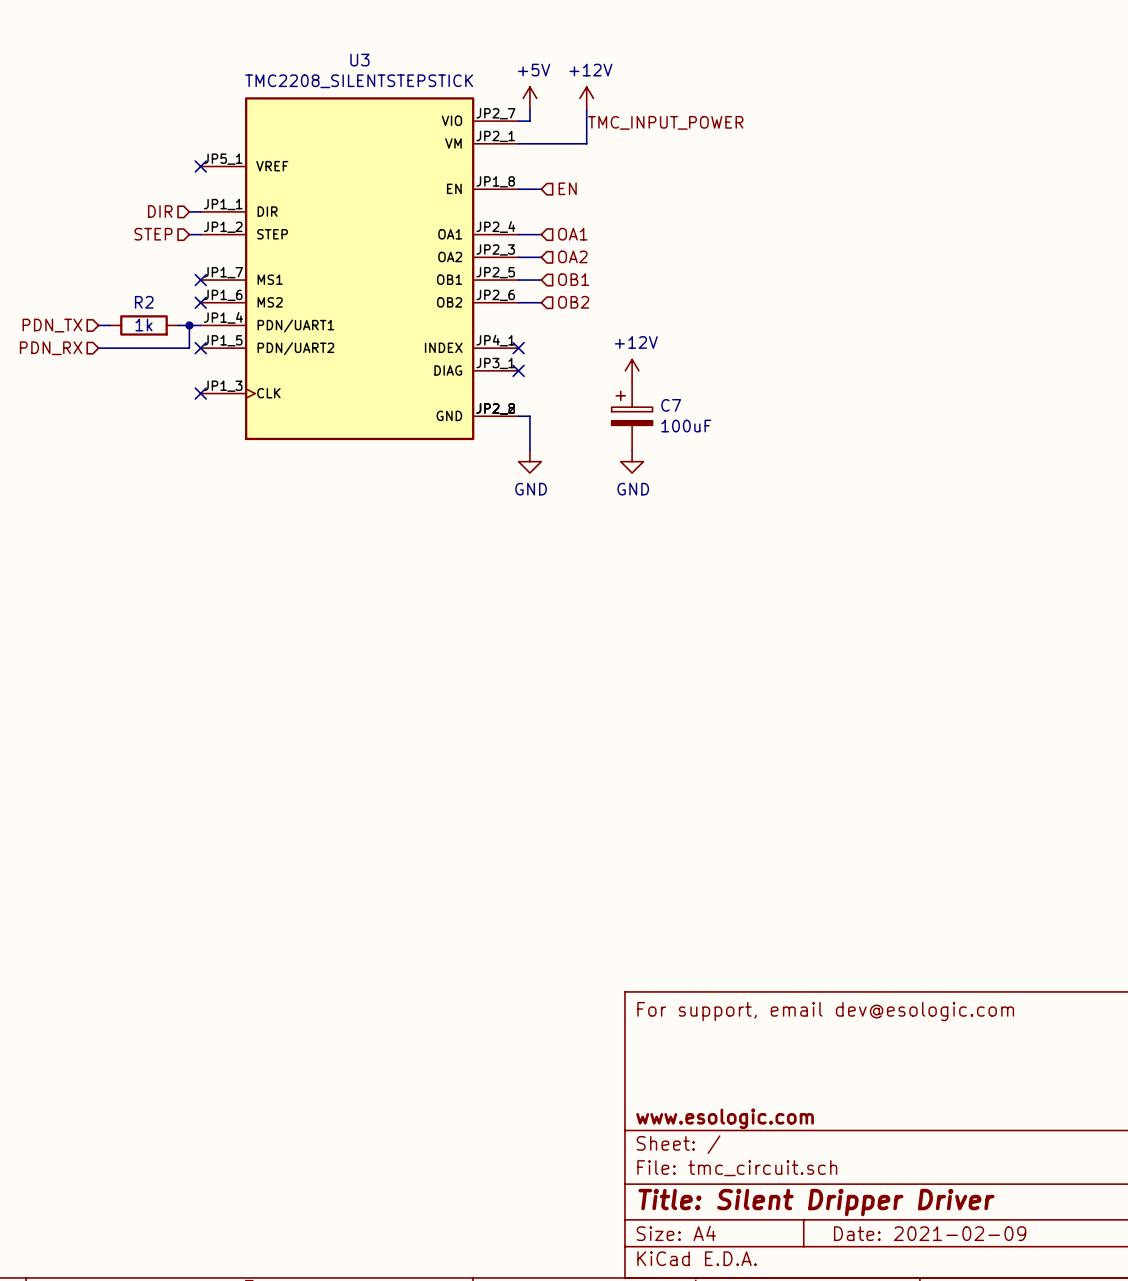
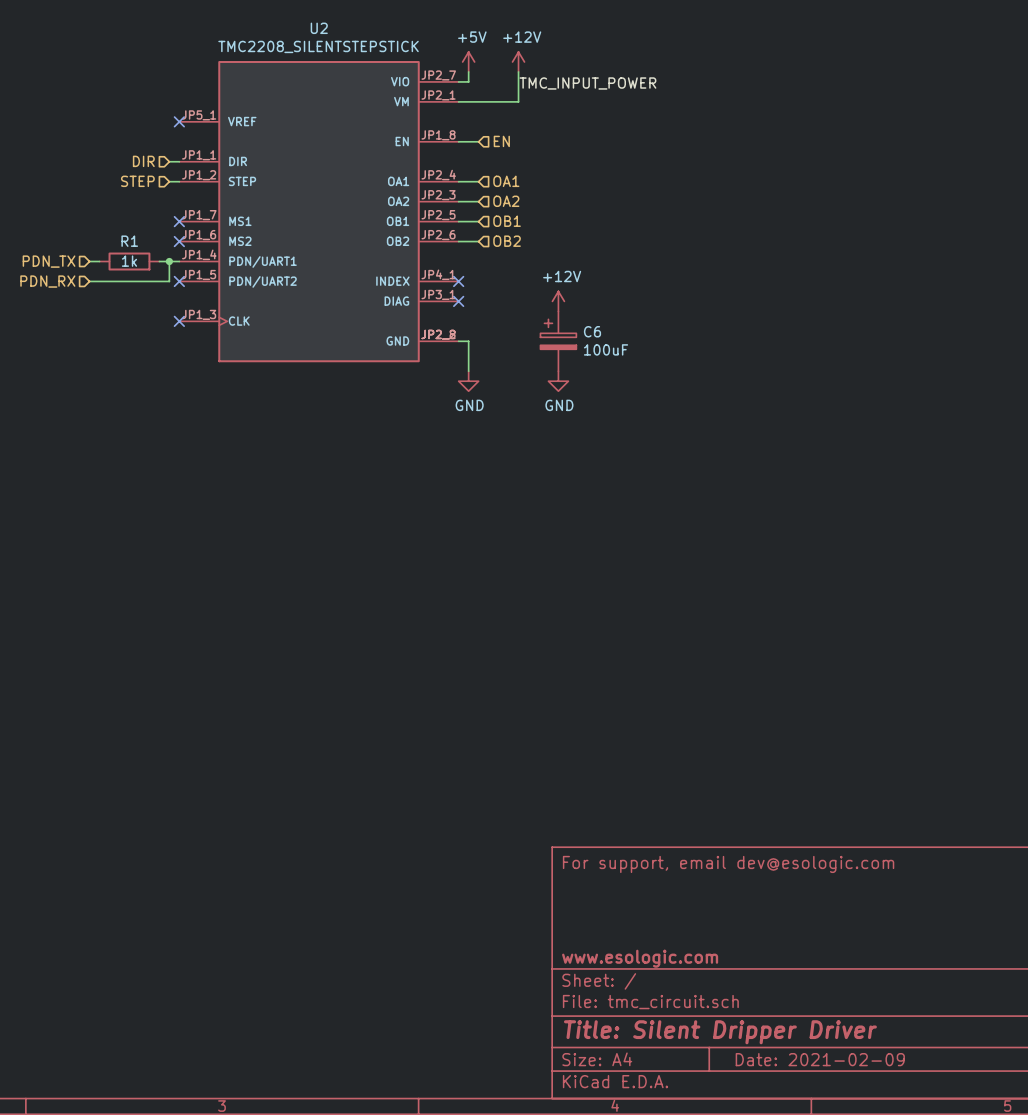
U3 name: U3 (359, 60) -> U2 (319, 28)
R2 name: R2 (144, 302) -> R1 (129, 241)
C7 name: C7 (671, 405) -> C6 (592, 331)

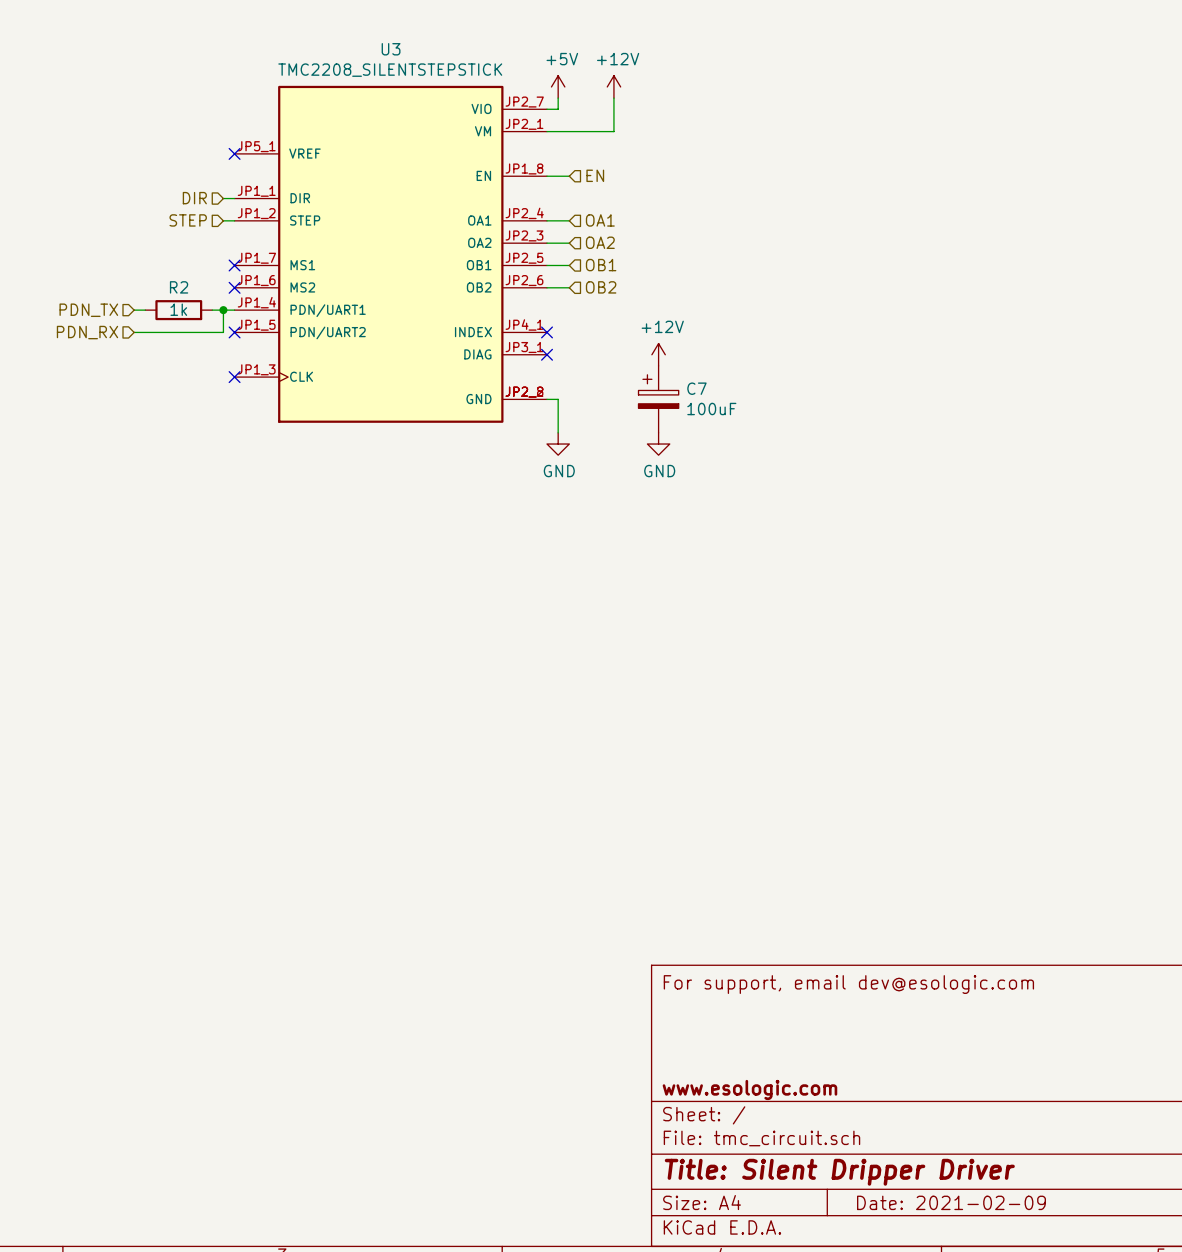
U2 name: U2 (319, 28) -> U3 (391, 49)
label: TMC_INPUT_POWER (587, 83) -> none
R1 name: R1 (129, 241) -> R2 (179, 287)
C6 name: C6 (592, 331) -> C7 (696, 388)

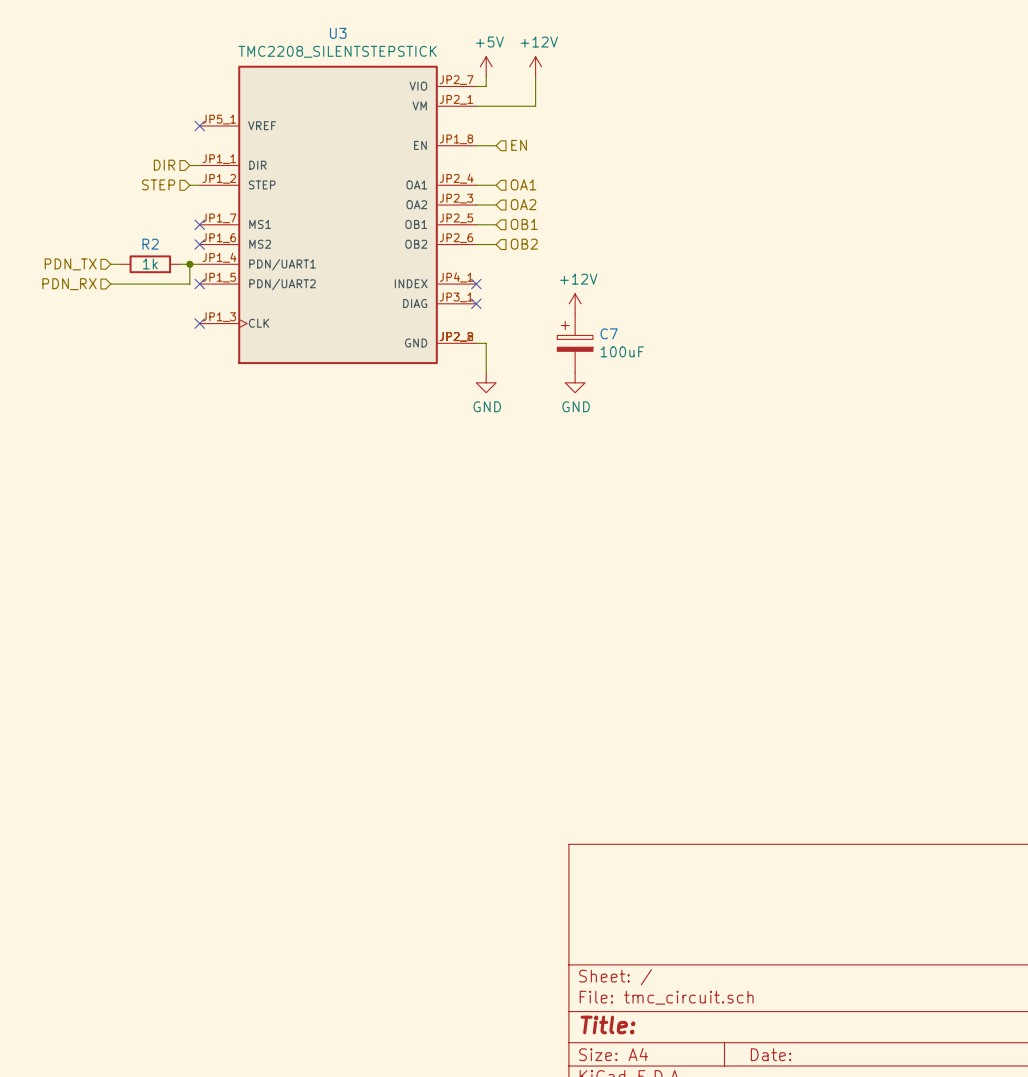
title block: For support, email dev@esologic.com (848, 984) -> none
title block: www.esologic.com (749, 1089) -> none
title block: Title: Silent Dripper Driver (839, 1172) -> Title: (608, 1024)
title block: Date: 2021-02-09 (951, 1202) -> Date: (771, 1054)

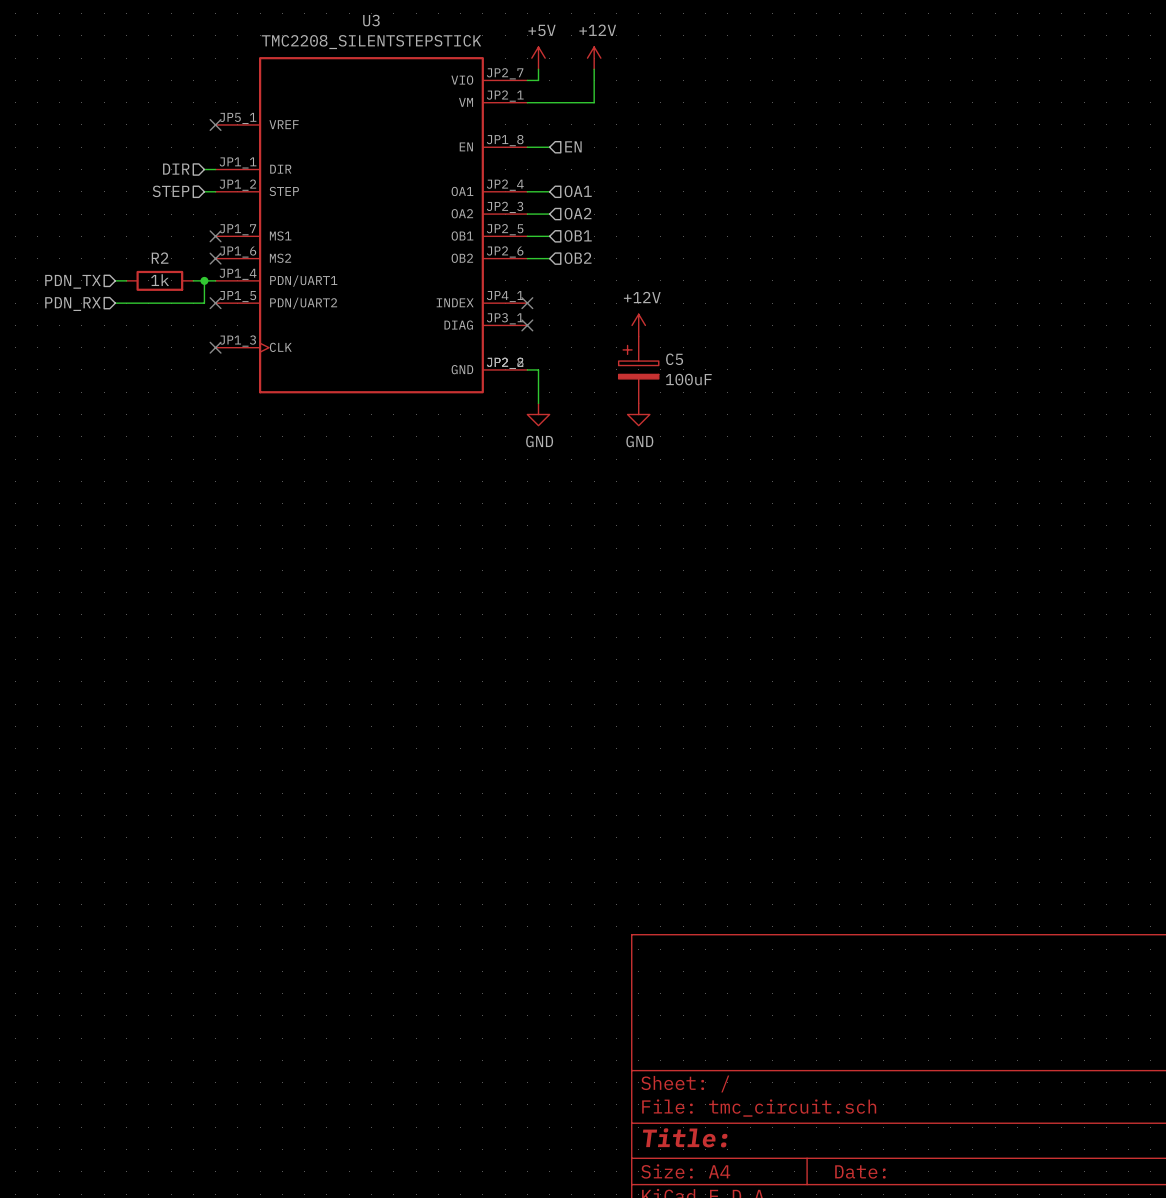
C7 name: C7 (609, 333) -> C5 (674, 359)

